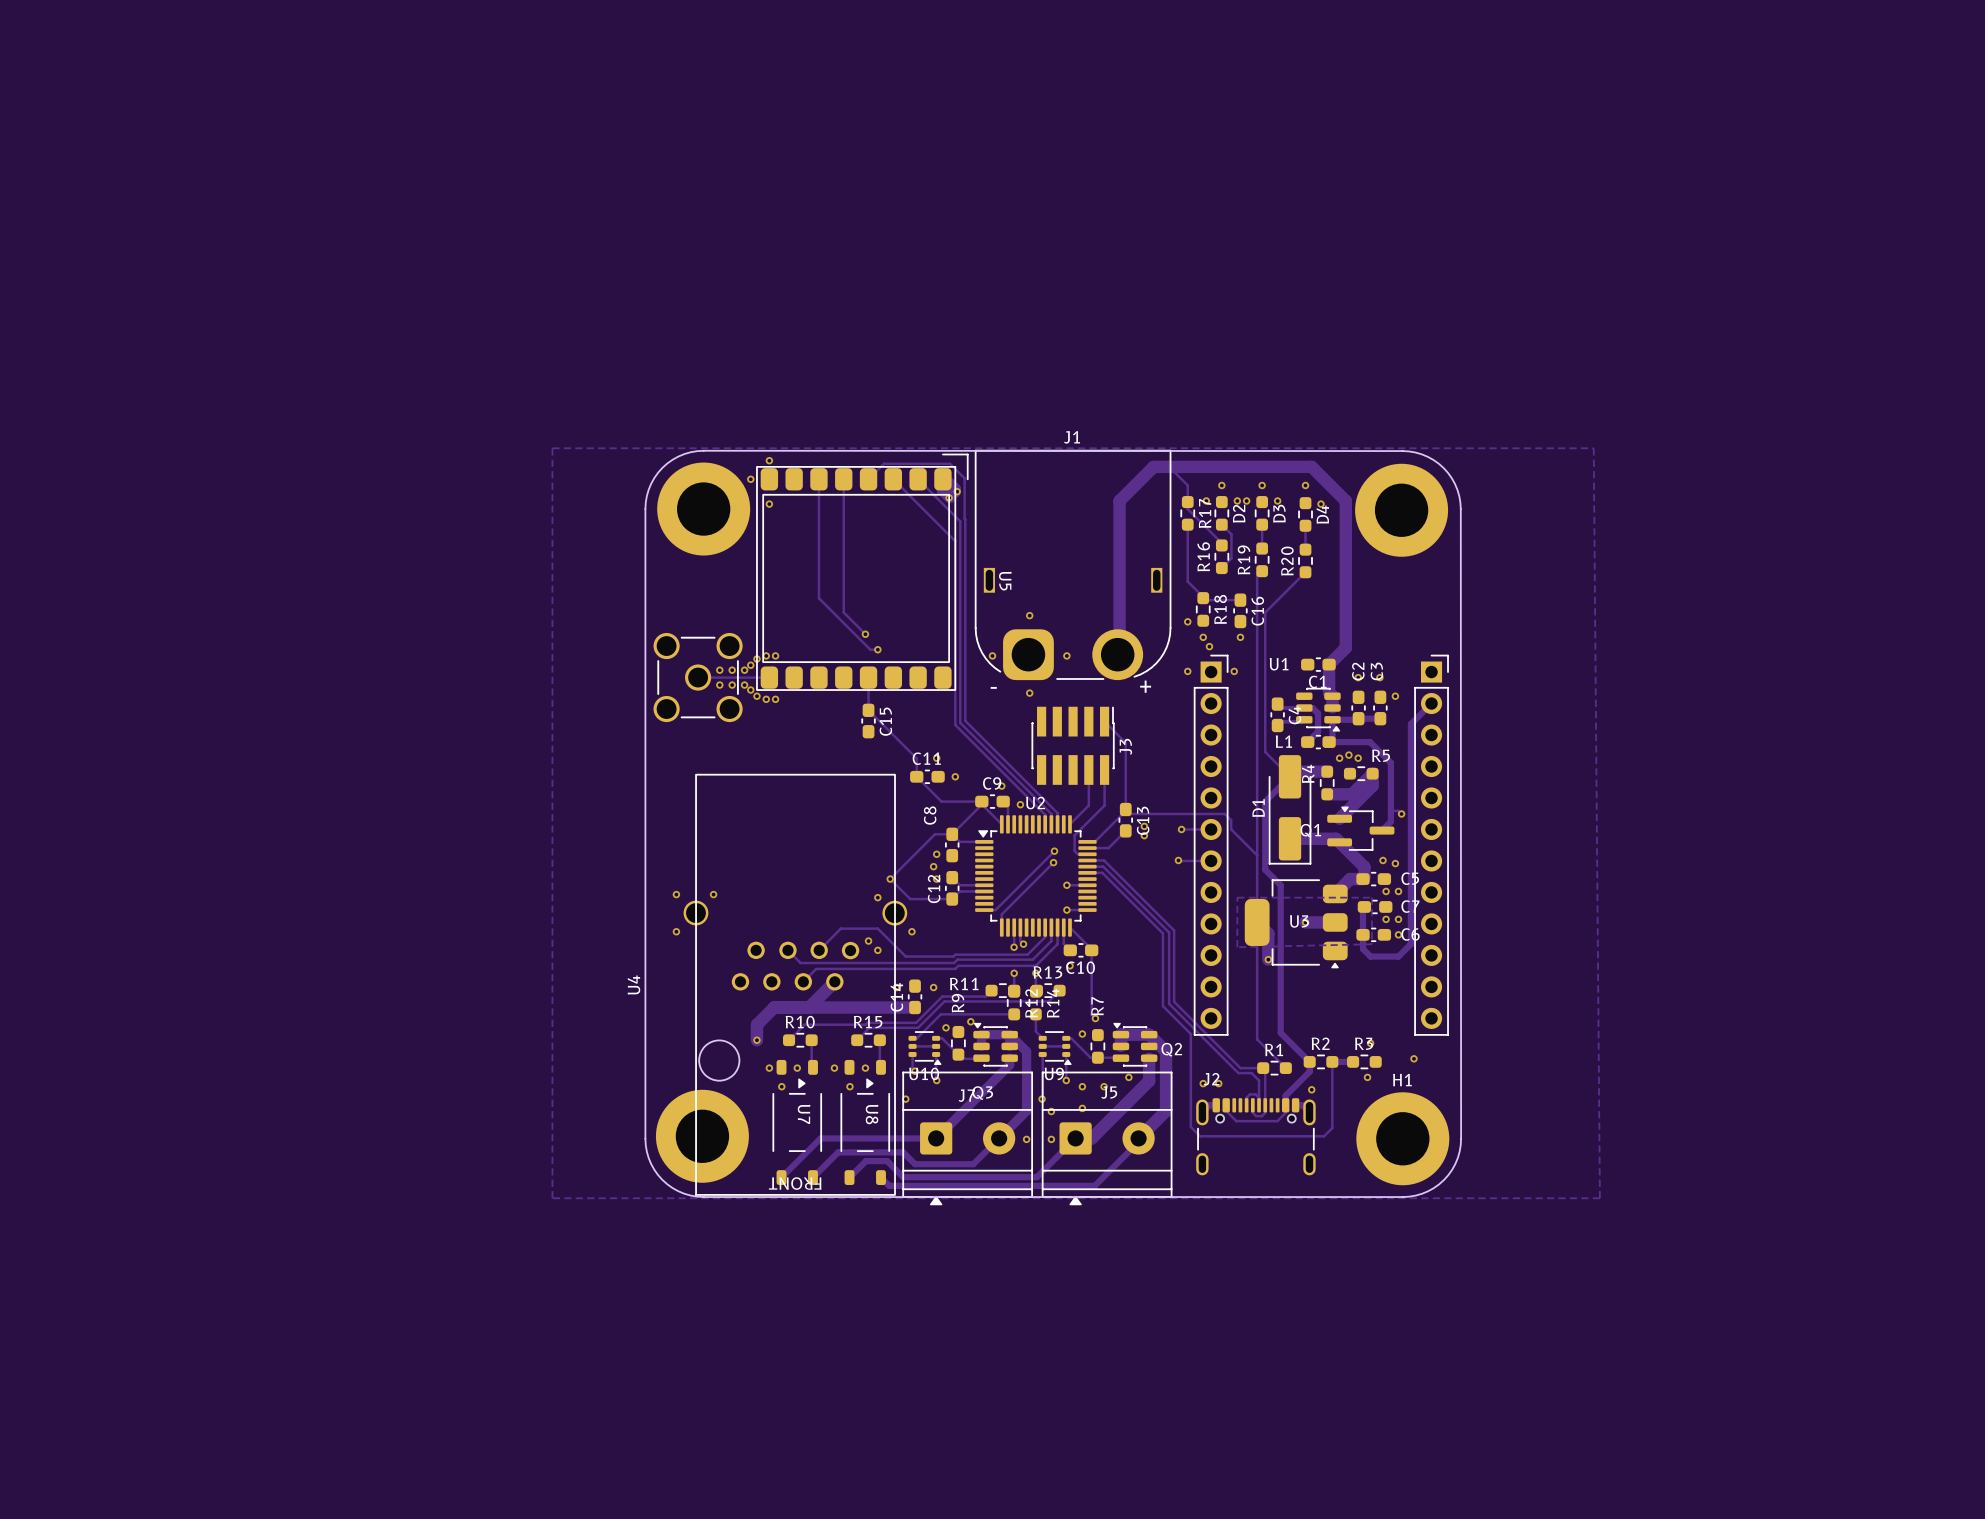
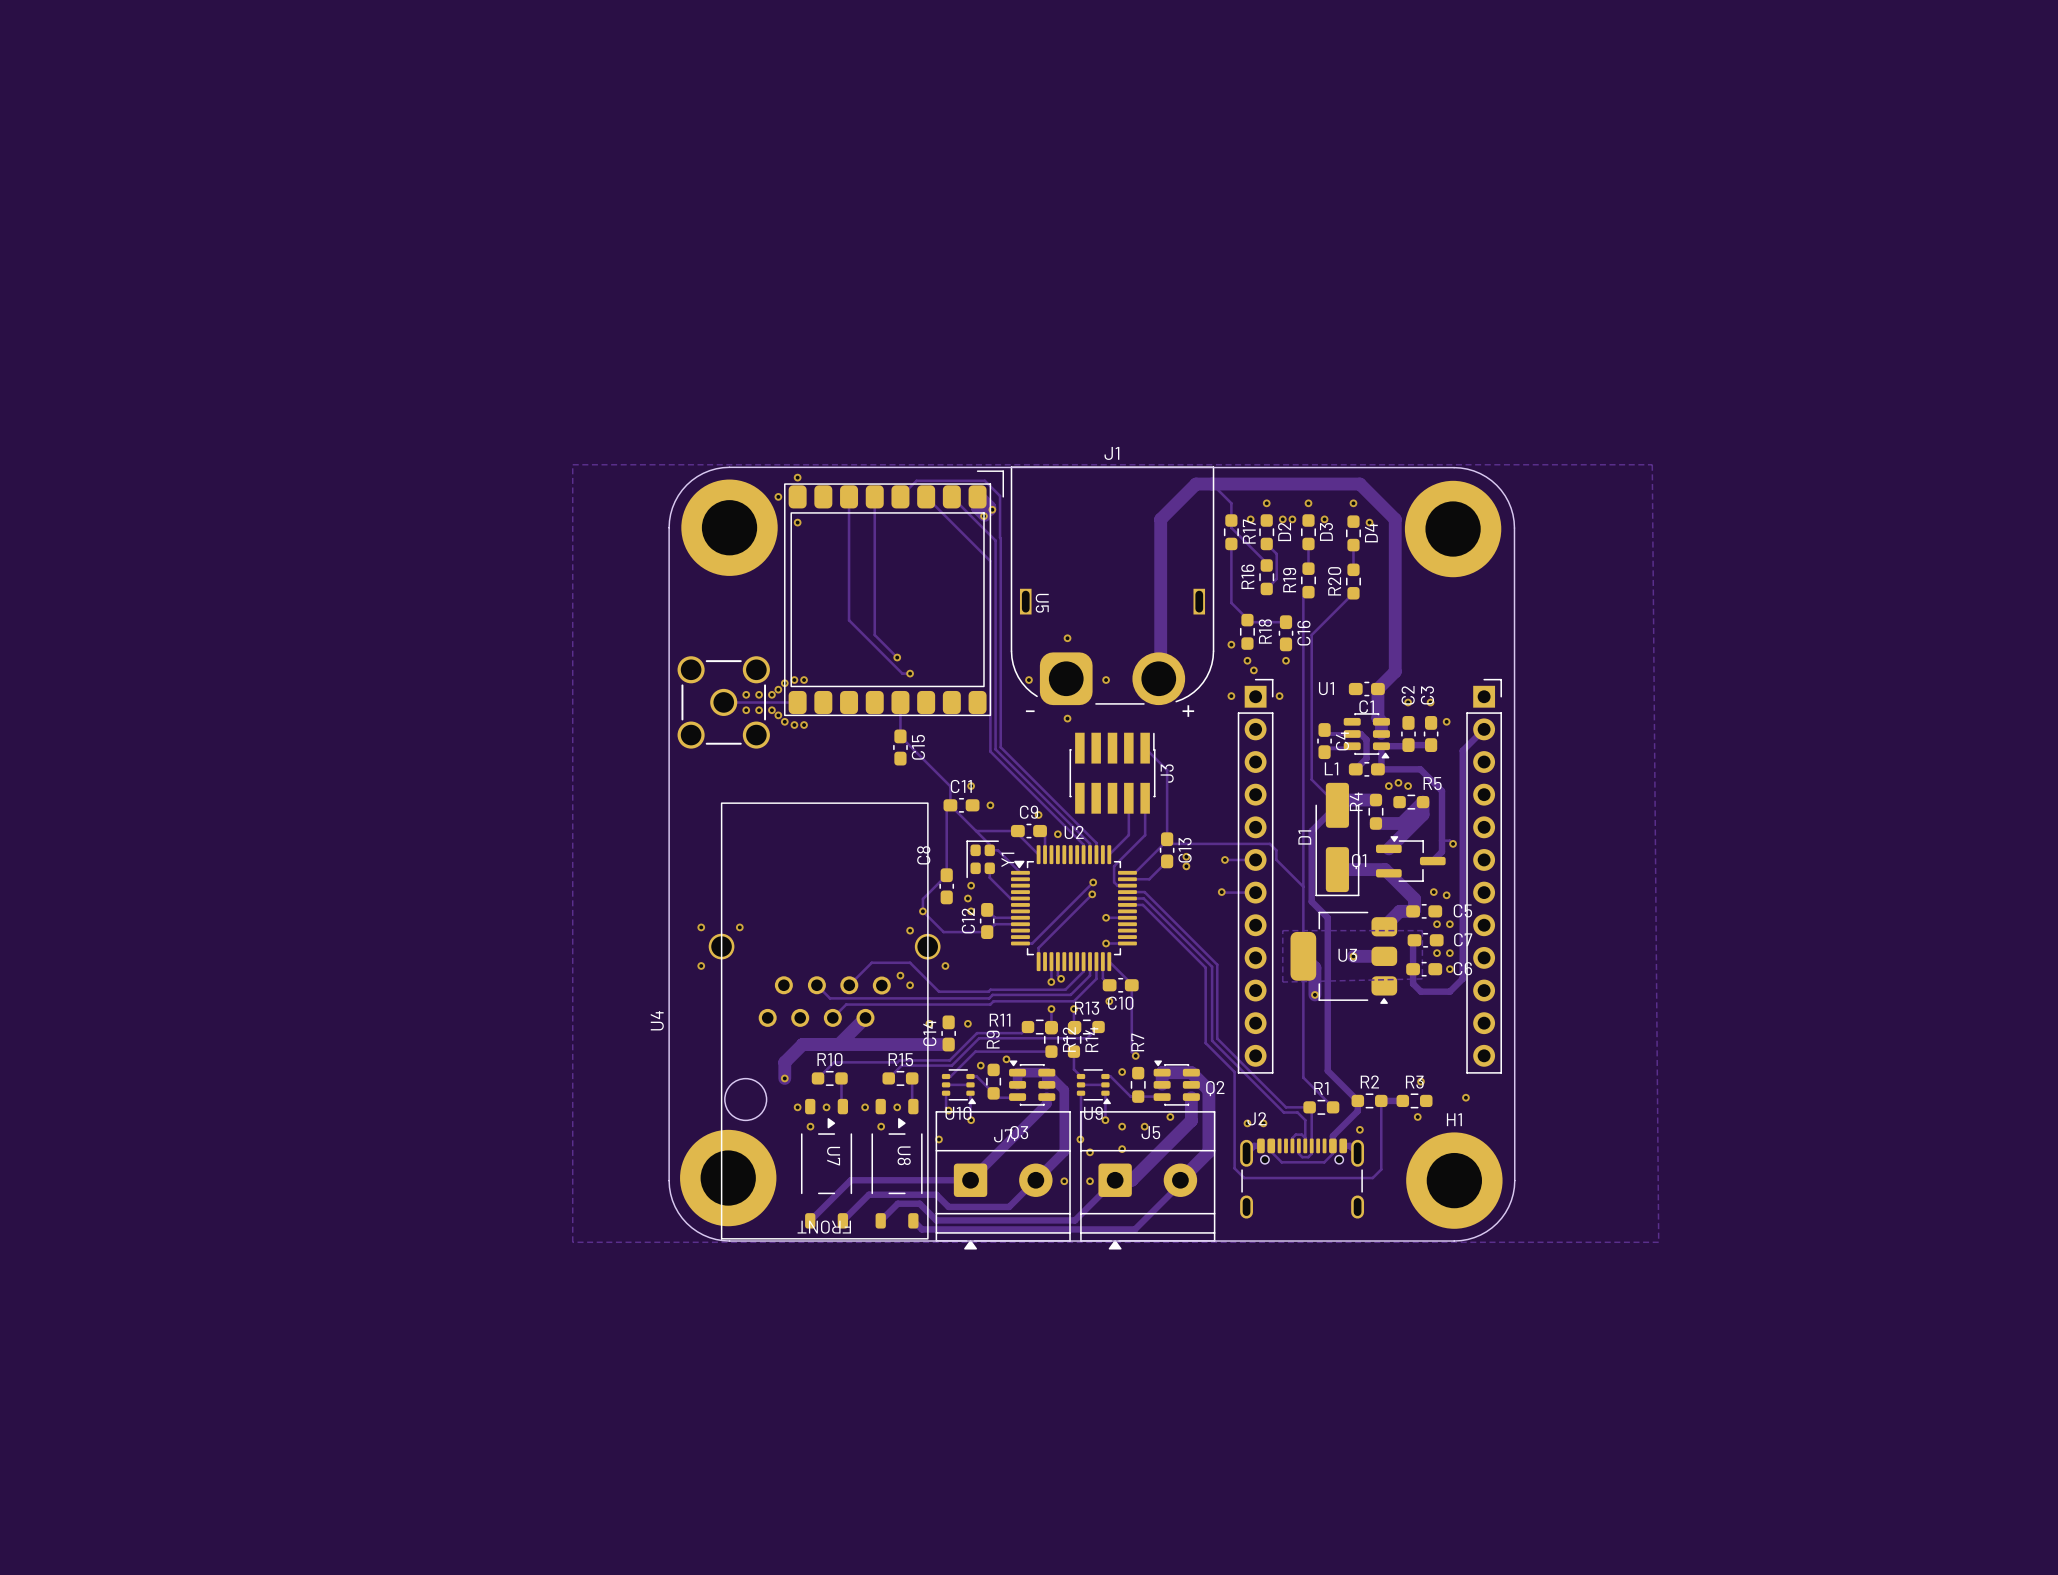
track: (981, 804) (952, 834) -> none
Y1: none -> (982, 859)
track: (952, 834) (959, 841) (984, 841) -> (976, 831) (989, 844) (989, 850) (997, 850) (1020, 872)
track: (952, 834) (935, 834) (890, 879) -> (950, 805) (946, 809) (946, 875) (922, 898) (922, 911)
track: none -> (989, 868) (989, 877) (1010, 898) (1020, 898)
C8 position: (952, 844) -> (946, 886)

